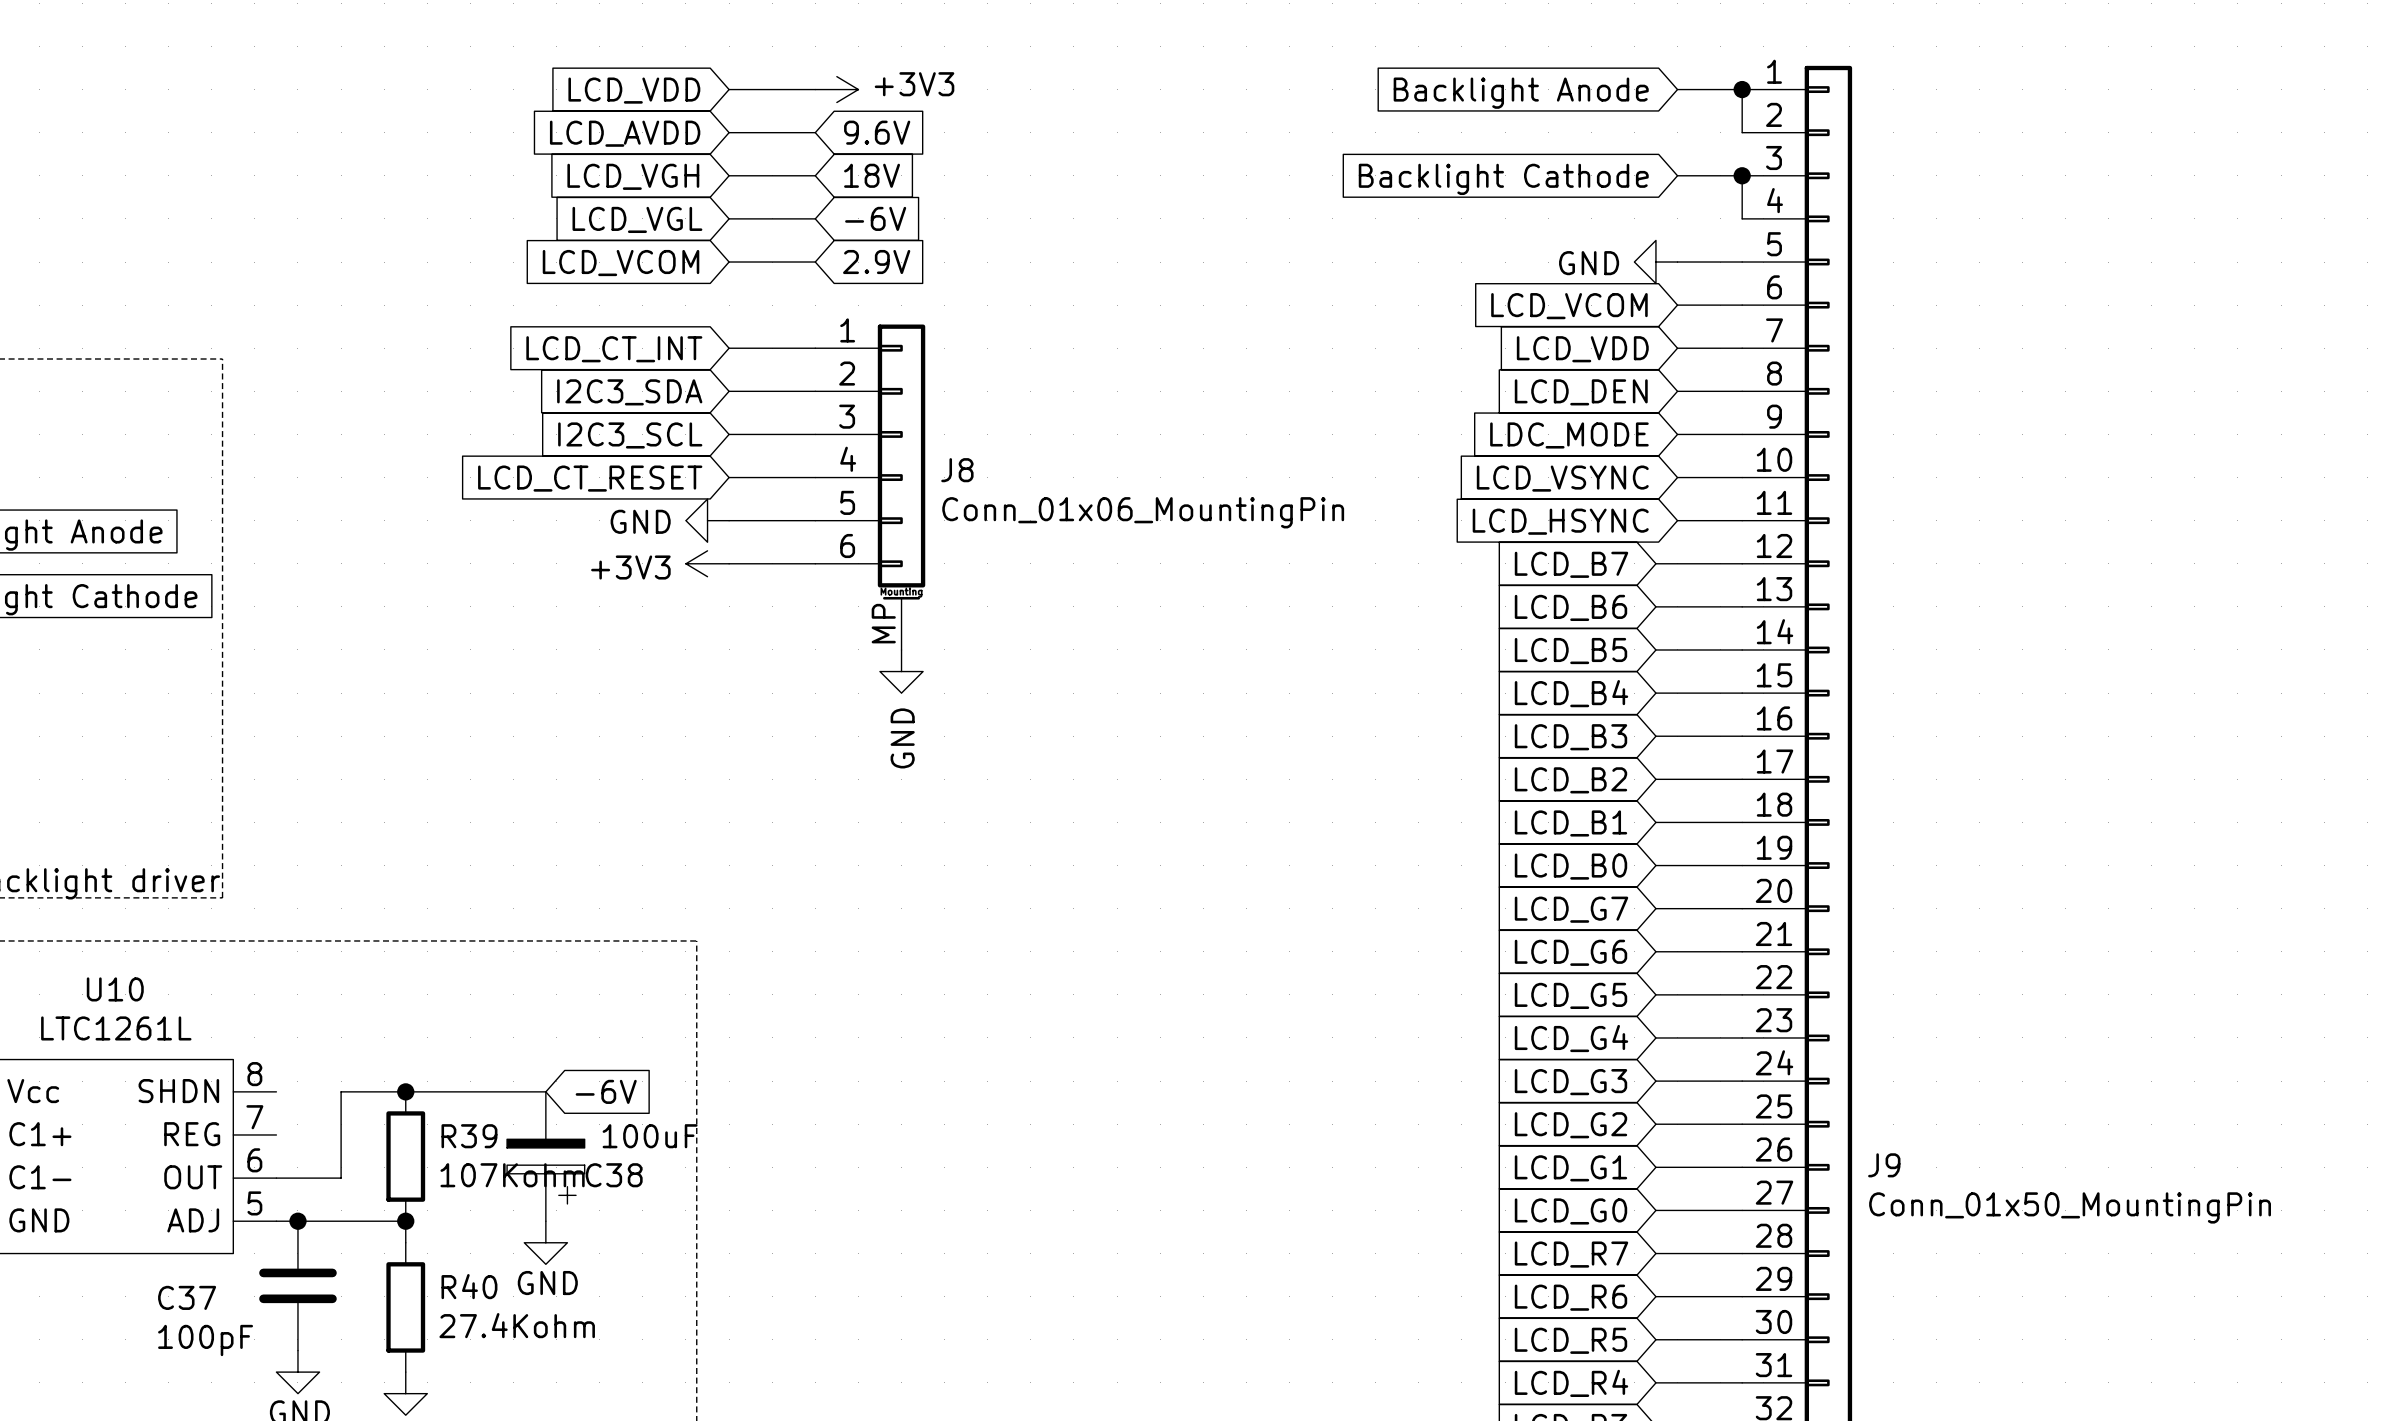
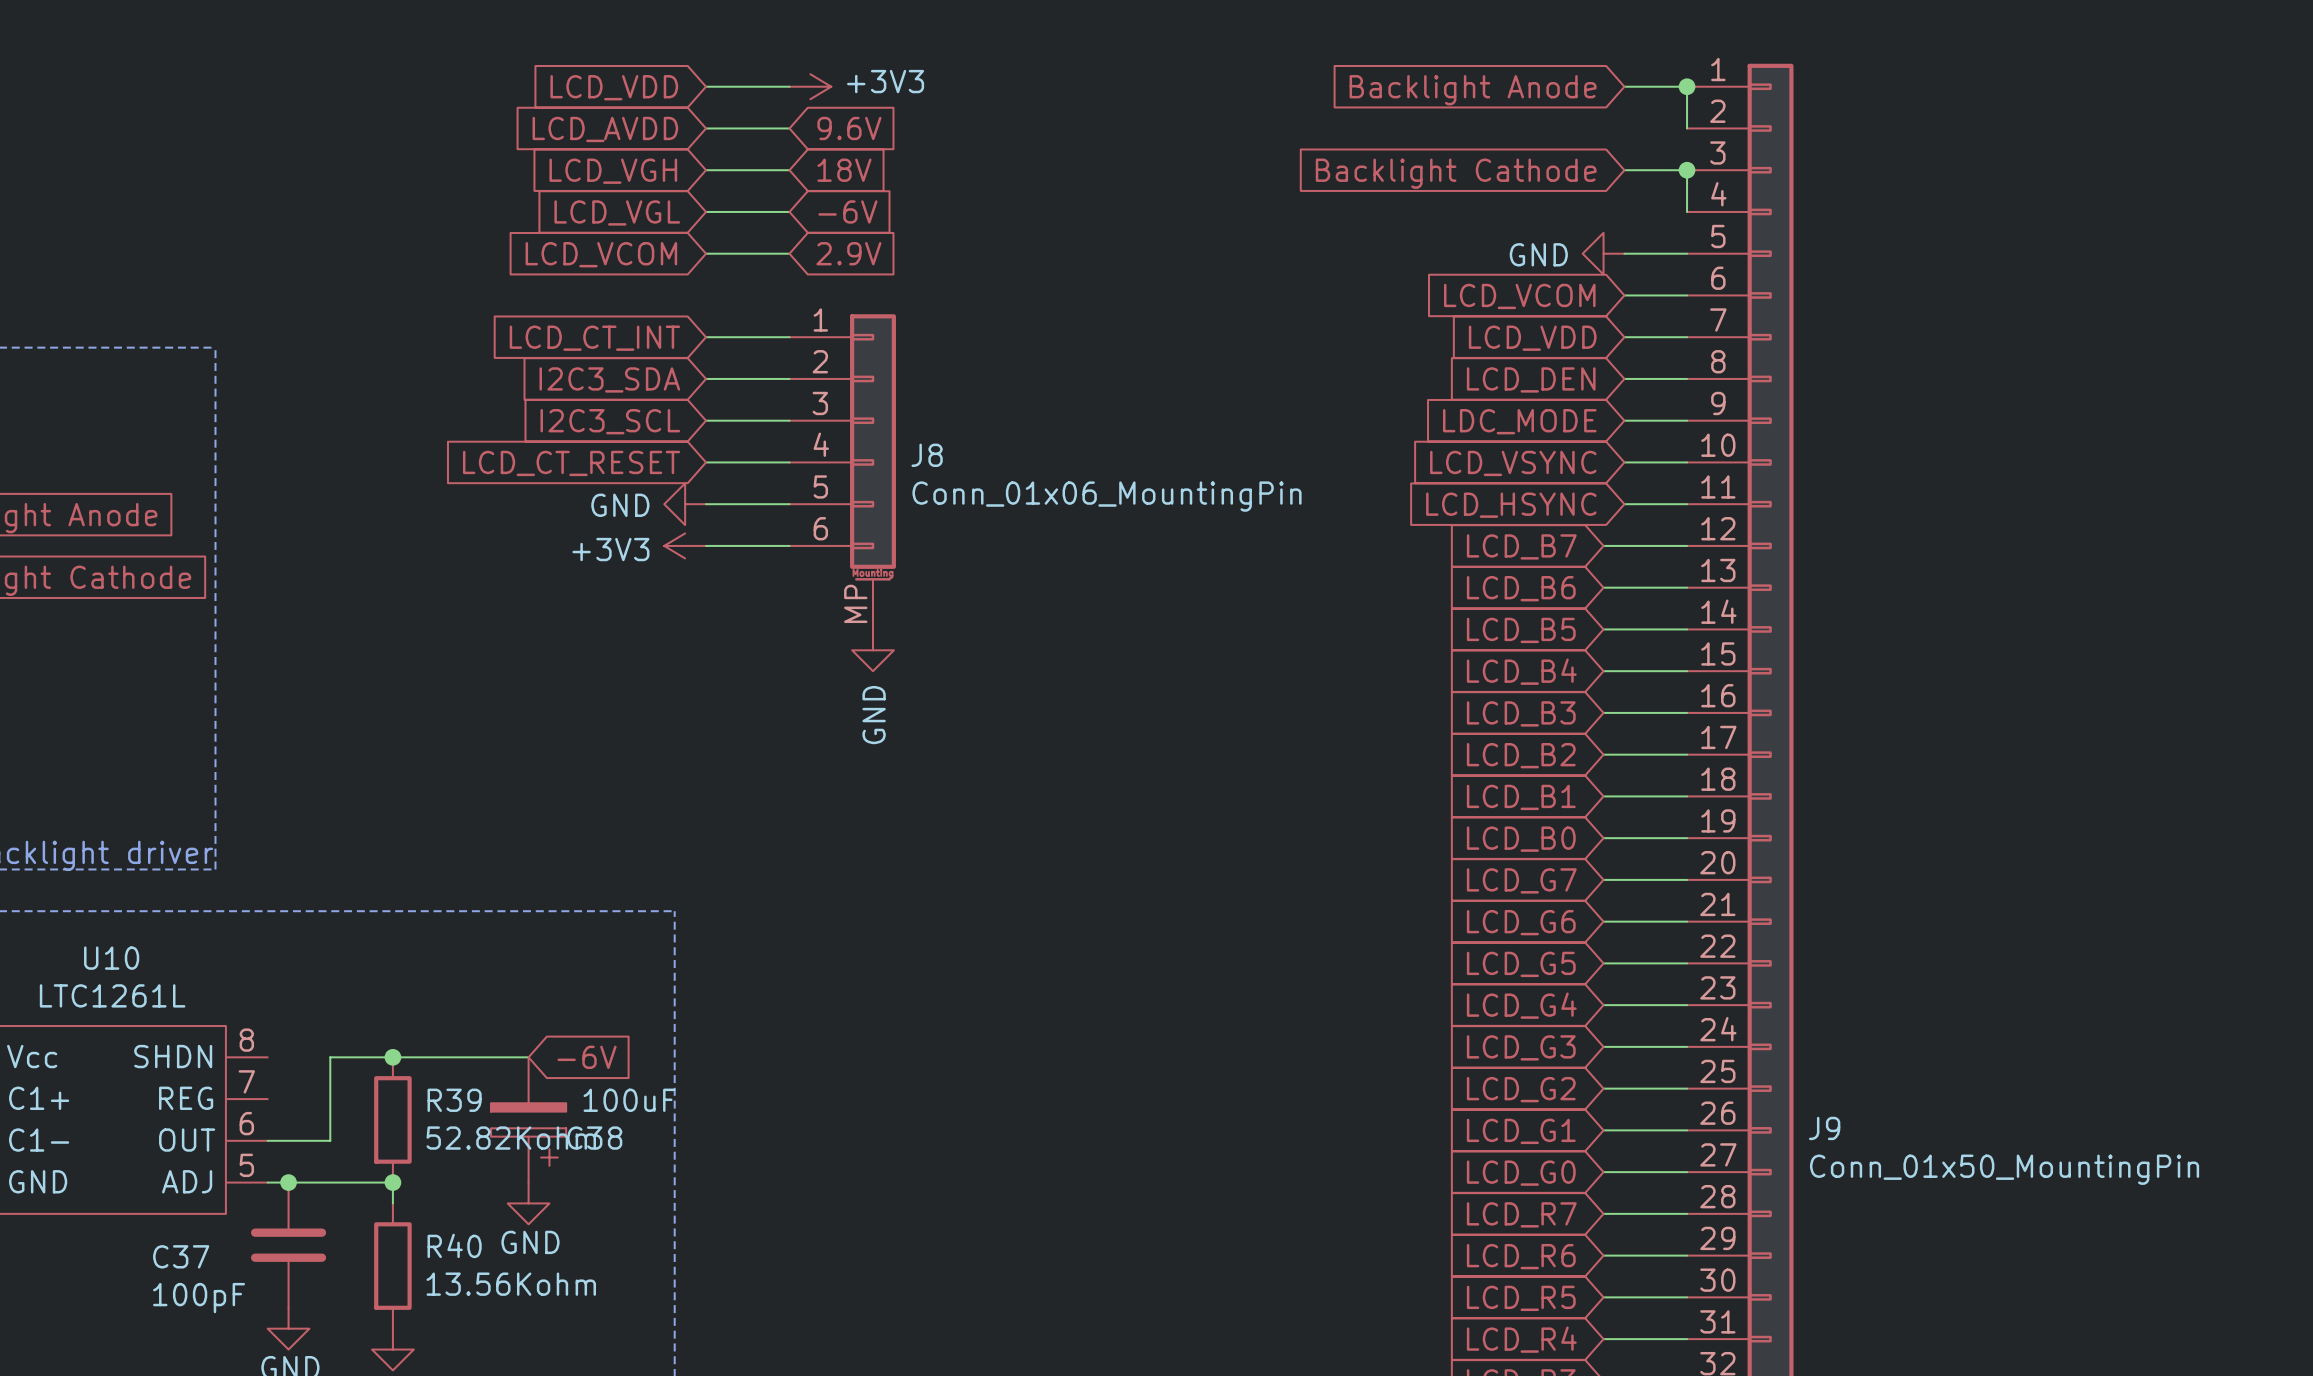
R39 value: 107Kohm (512, 1175) -> 52.82Kohm (511, 1138)
R40 value: 27.4Kohm (517, 1325) -> 13.56Kohm (511, 1284)

